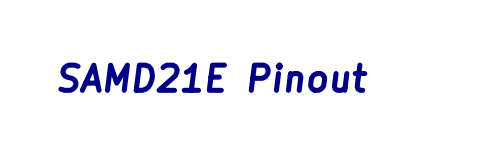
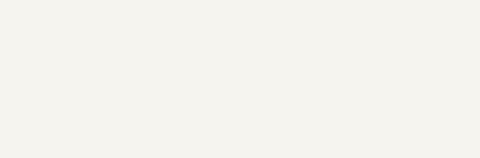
text: SAMD21E Pinout (212, 77) -> none

